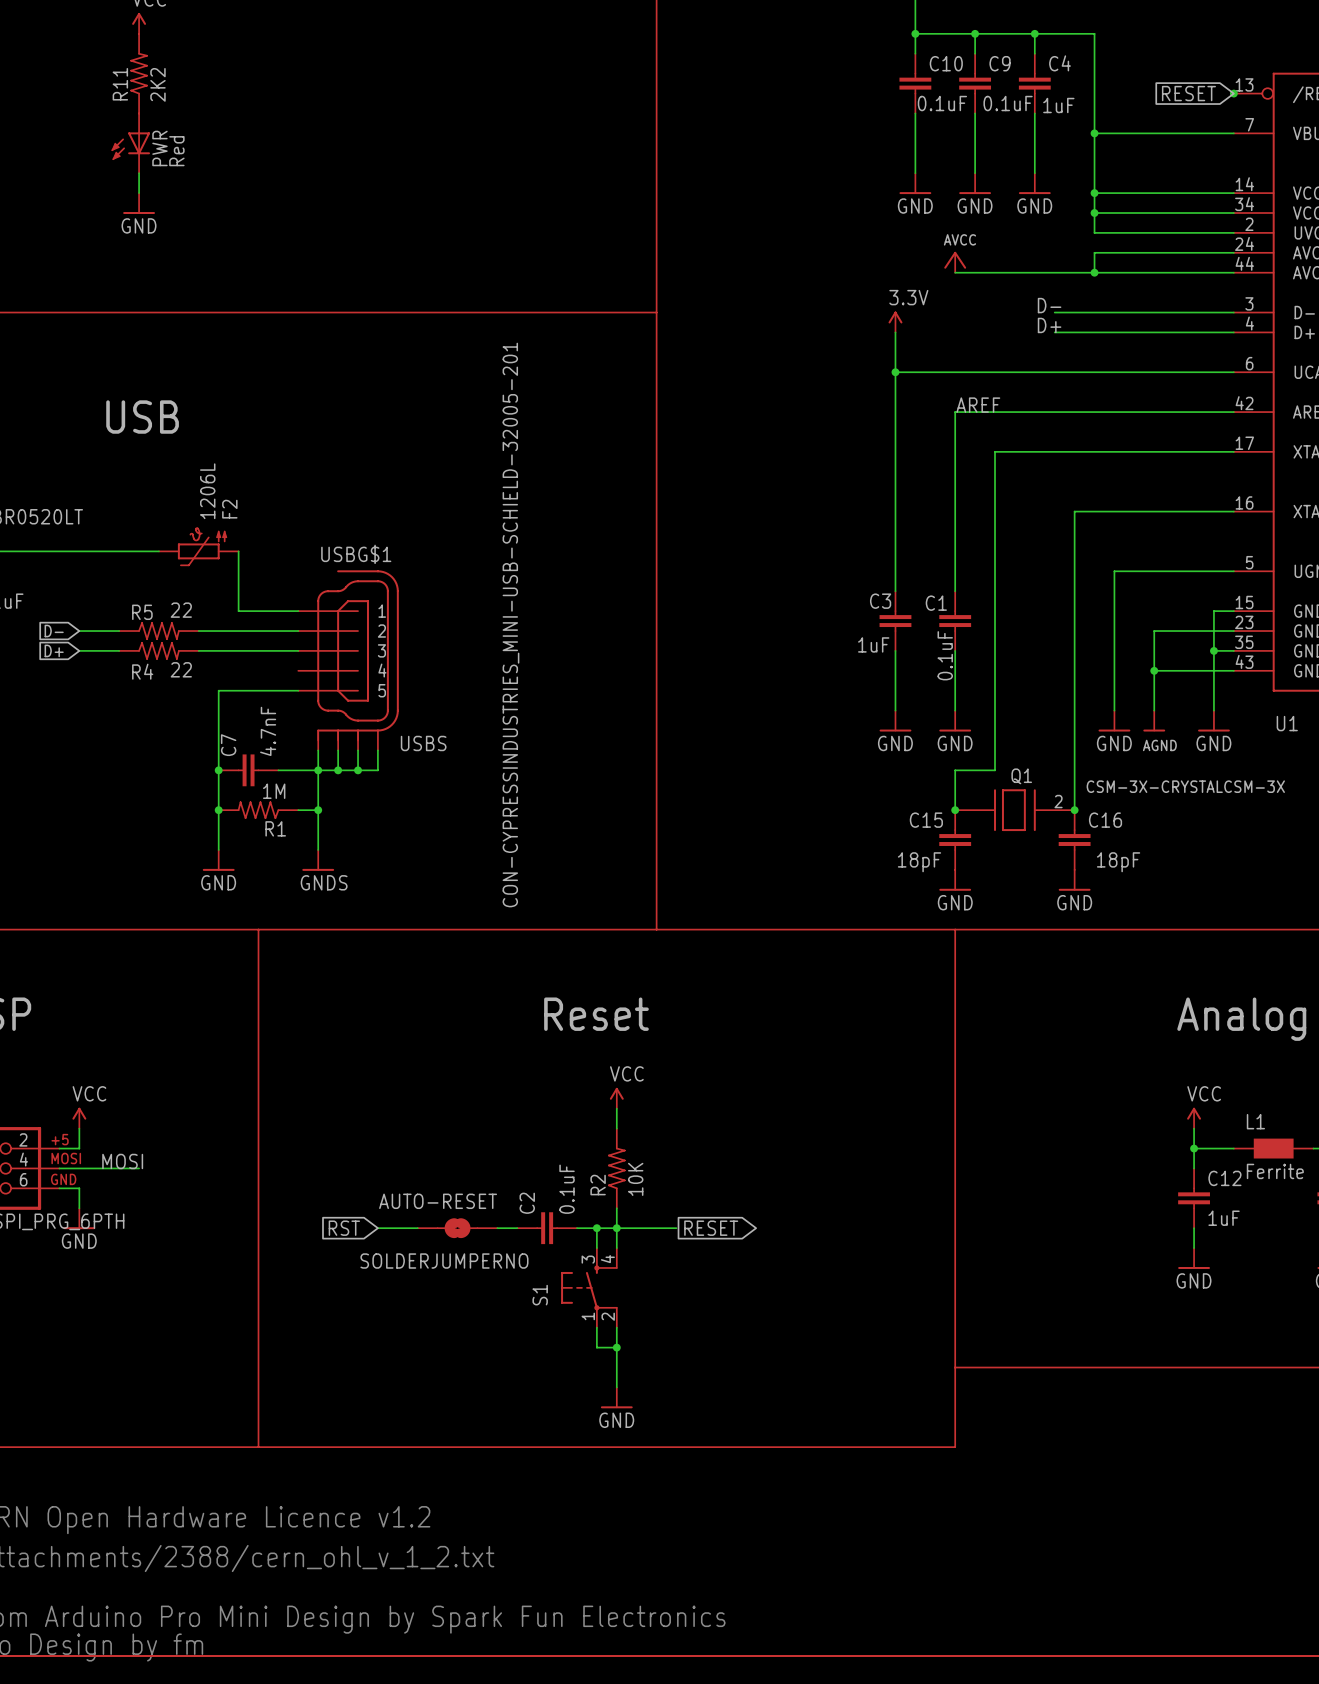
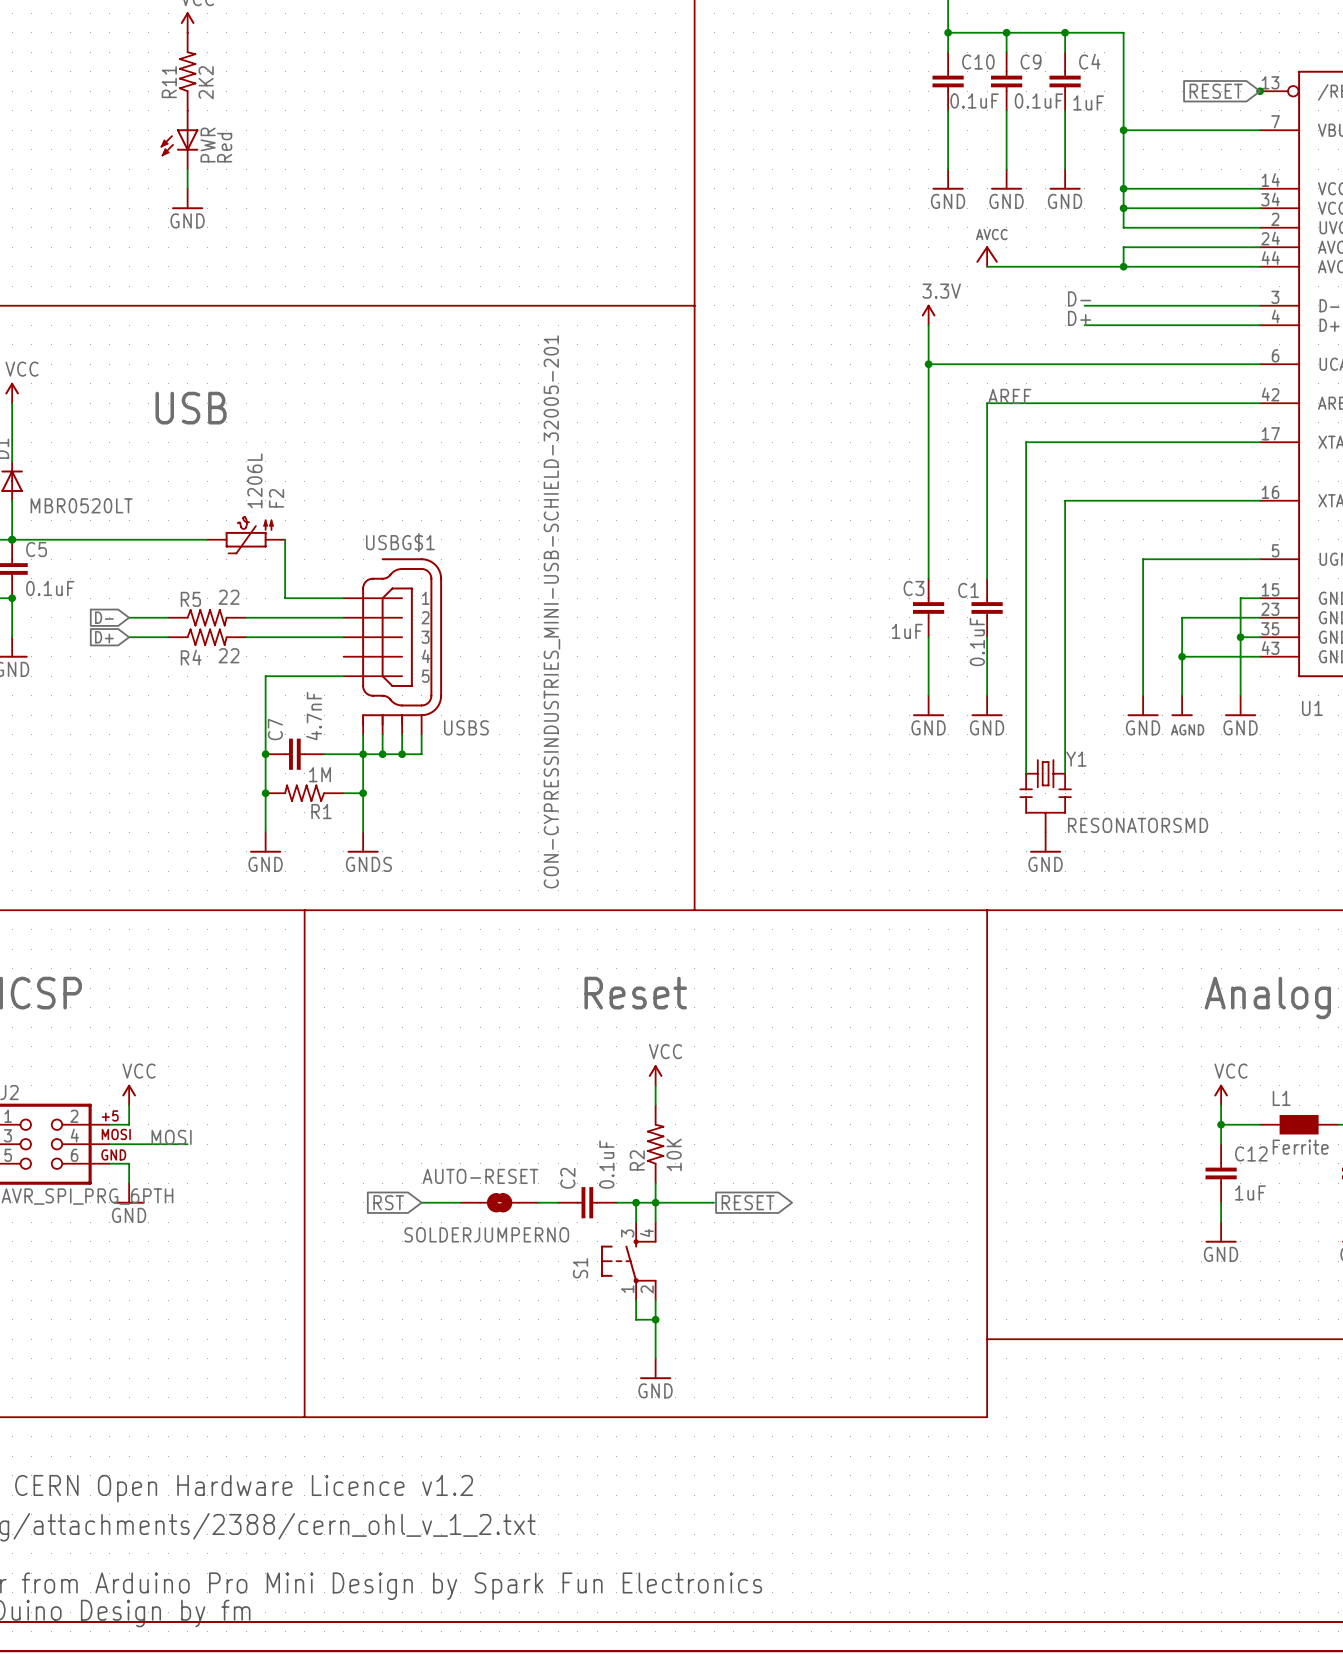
wire: (1074, 511) (1074, 810) -> (1104, 500) (1065, 500) (1065, 773)
wire: (995, 770) (955, 770) (955, 810) -> (1026, 754) (1026, 773)
junction: (955, 810) -> none
Q1: CSM-3X-CRYSTALCSM-3X (1014, 810) -> none
junction: (1074, 810) -> none
Y1: none -> RESONATORSMD (1045, 796)
C15: 18pF (955, 840) -> none
C16: 18pF (1074, 840) -> none
power symbol: none -> GND (1045, 842)
power symbol: GND (955, 880) -> none
power symbol: GND (1074, 880) -> none

